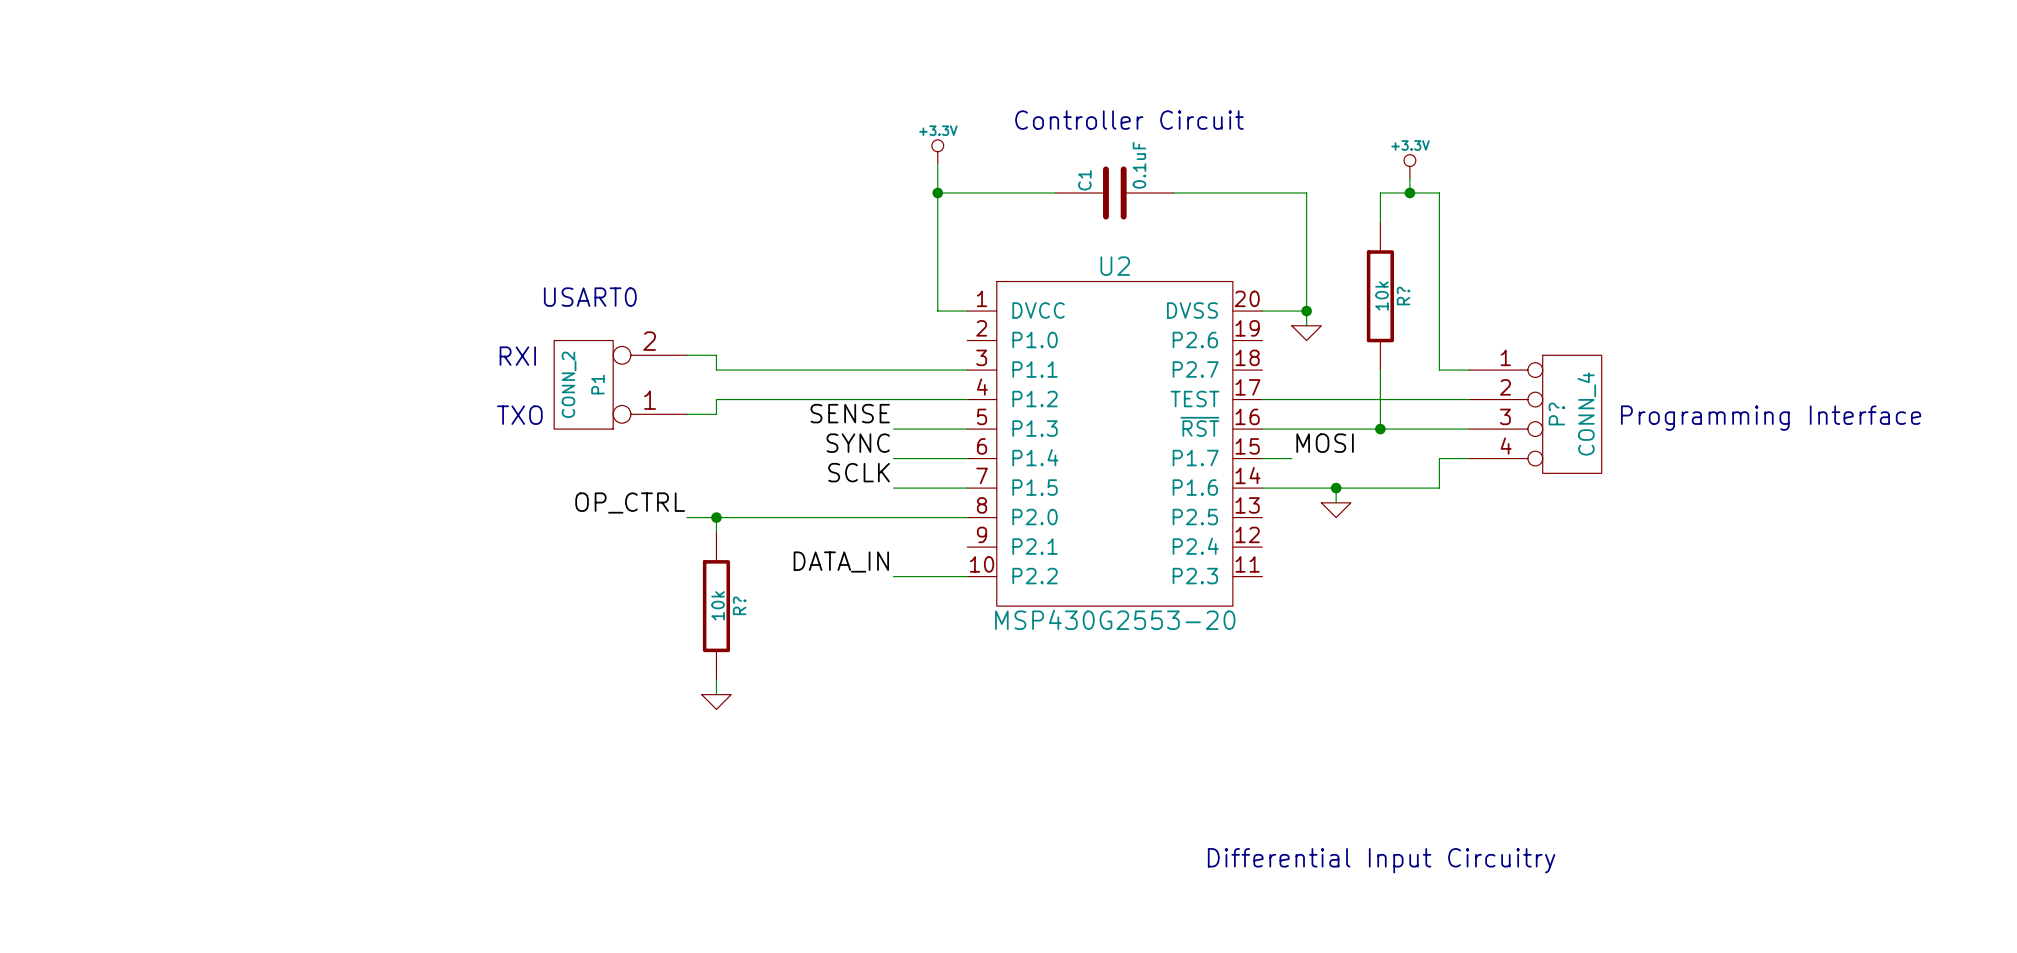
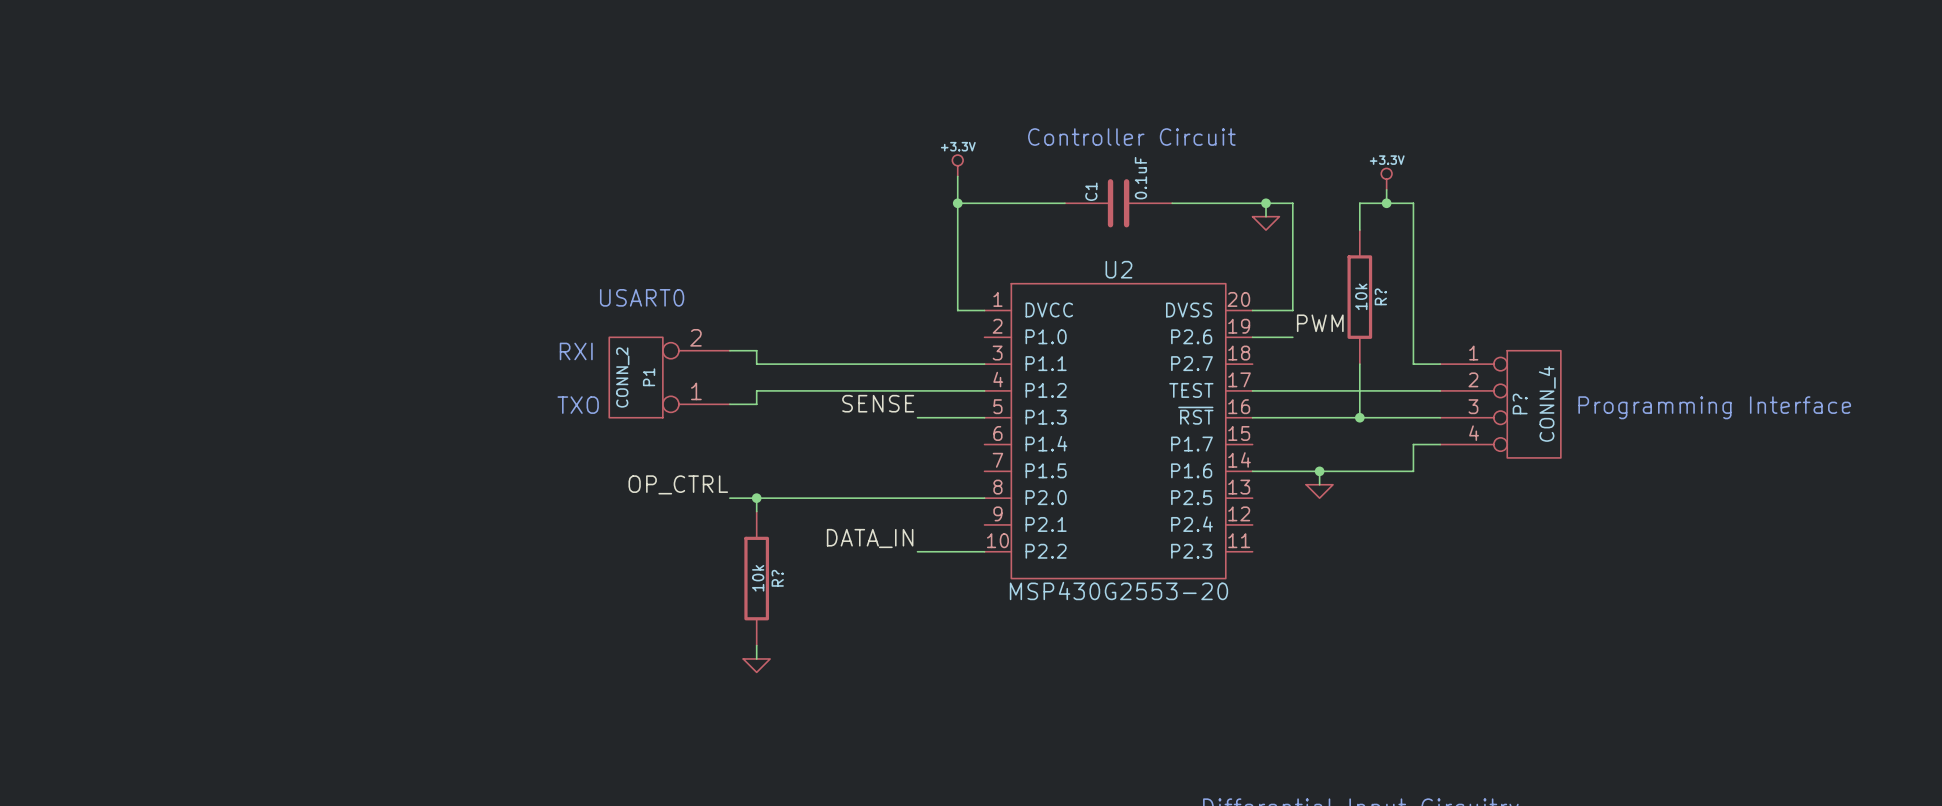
junction: none -> (1266, 203)
wire: (1306, 311) (1306, 325) -> (1266, 203) (1266, 216)
junction: (1306, 311) -> none
label: none -> PWM (1320, 323)
power symbol position: (1306, 333) -> (1266, 223)
wire: none -> (1252, 337) (1292, 337)
label: SYNC (858, 443) -> none
label: MOSI (1325, 443) -> none
wire: (893, 458) (967, 458) -> none
wire: (1262, 458) (1291, 458) -> none
label: SCLK (859, 472) -> none
wire: (893, 488) (967, 488) -> none

